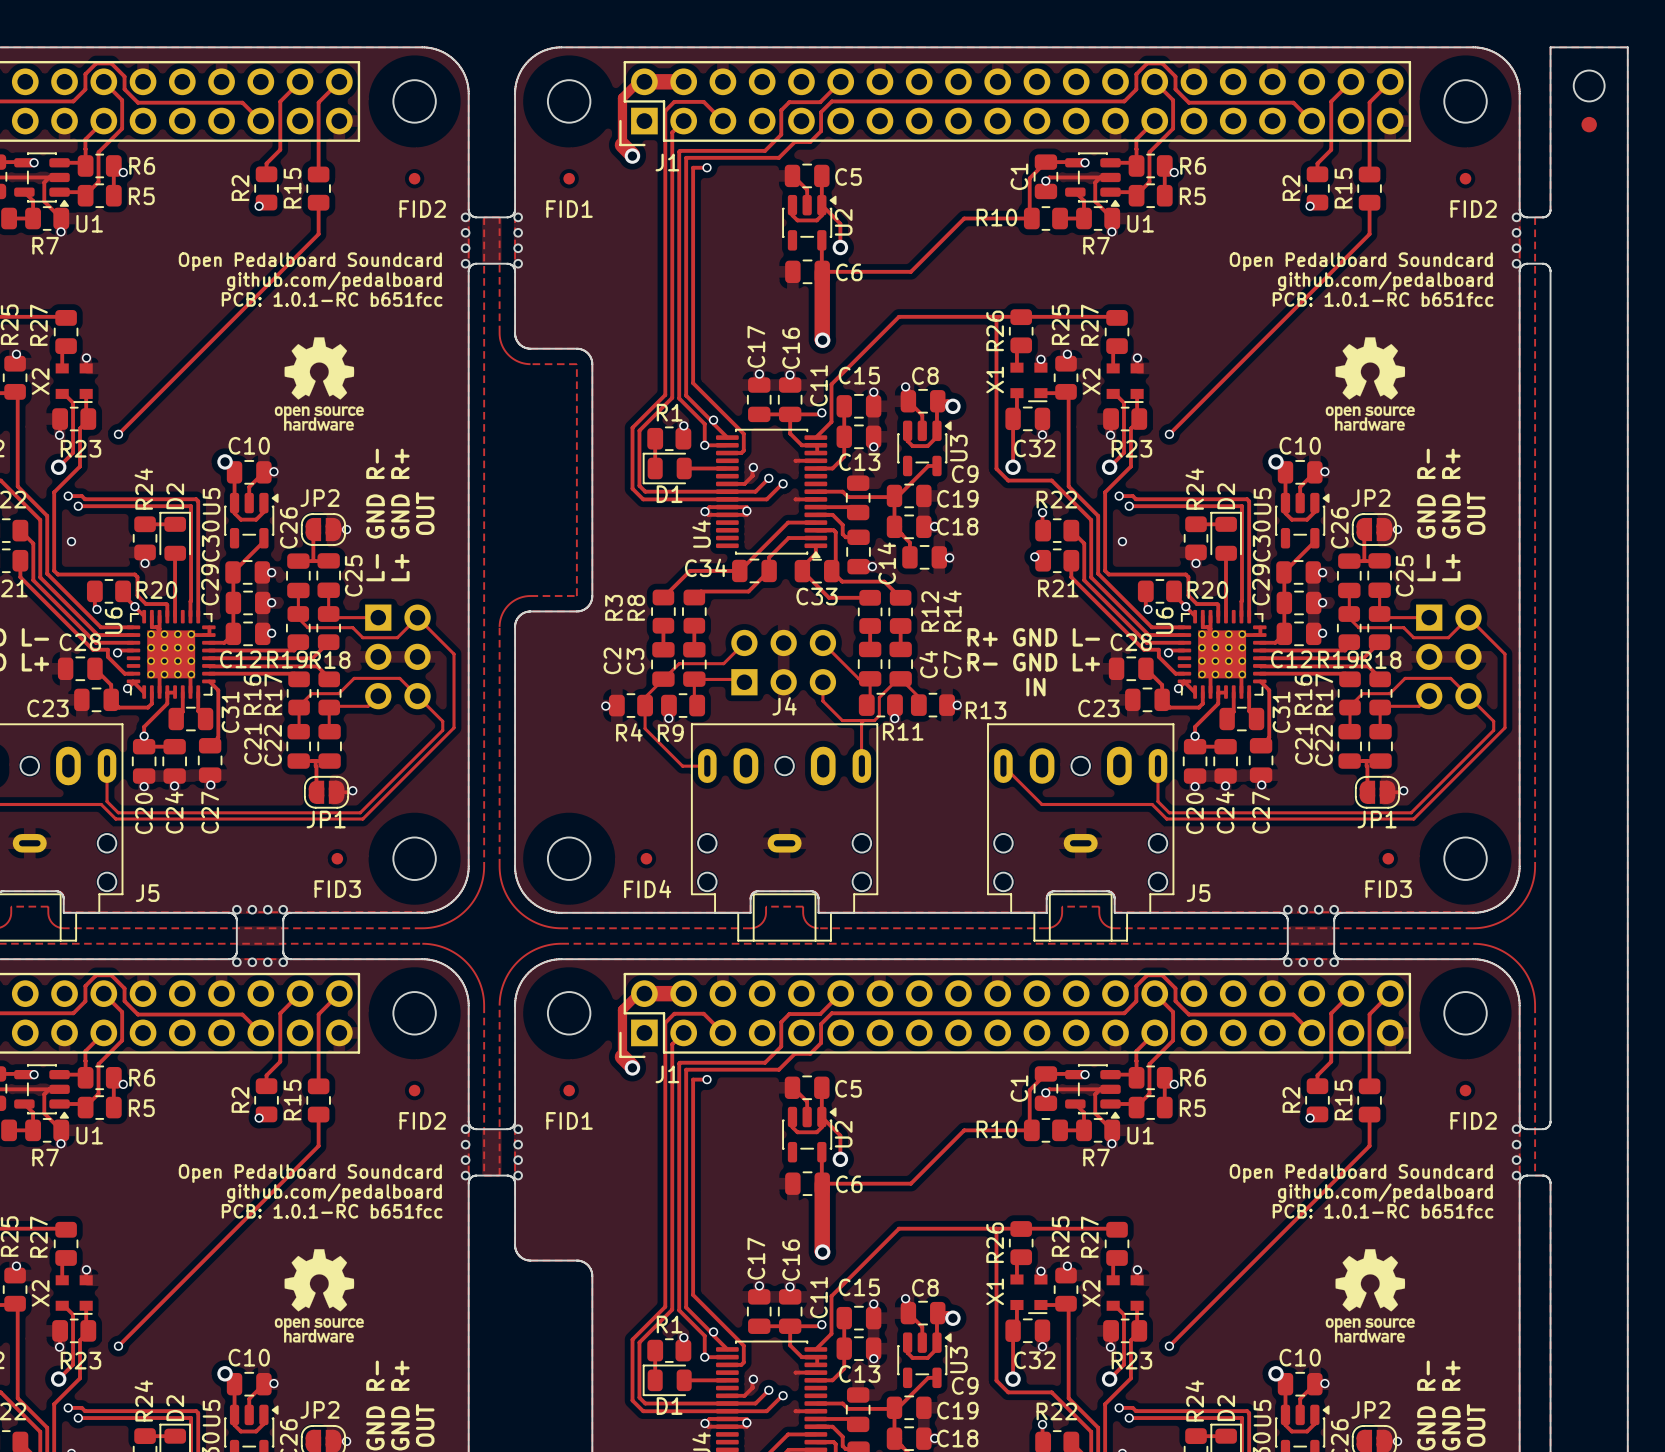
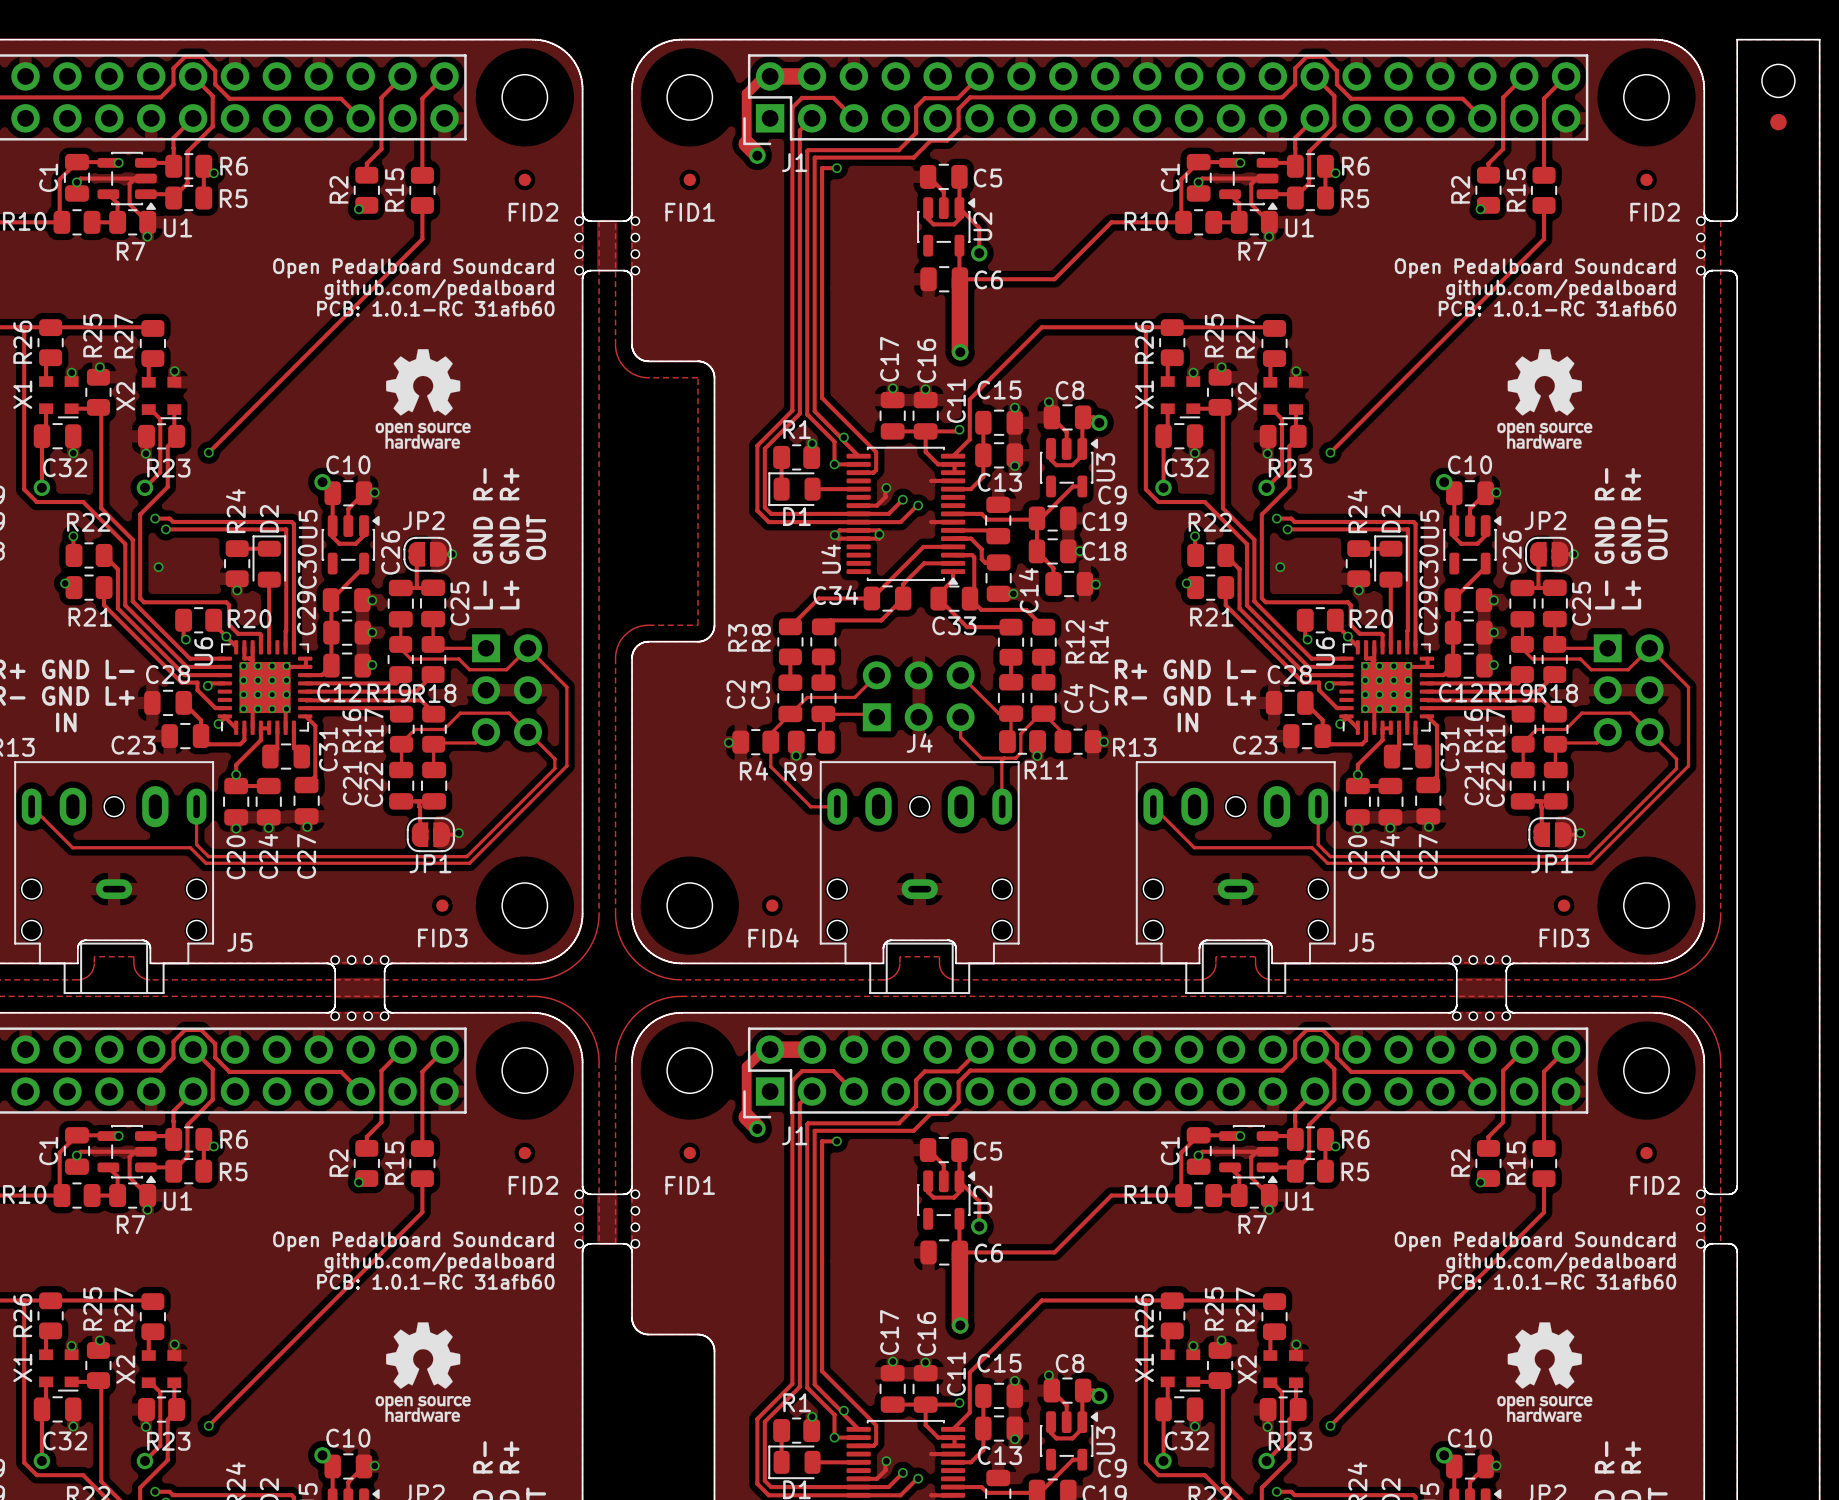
text: PCB: 1.0.1-RC b651fcc (332, 299) -> PCB: 1.0.1-RC 31afb60 (435, 308)
text: PCB: 1.0.1-RC b651fcc (1383, 299) -> PCB: 1.0.1-RC 31afb60 (1557, 308)
text: PCB: 1.0.1-RC b651fcc (332, 1211) -> PCB: 1.0.1-RC 31afb60 (435, 1281)
text: PCB: 1.0.1-RC b651fcc (1383, 1211) -> PCB: 1.0.1-RC 31afb60 (1557, 1281)

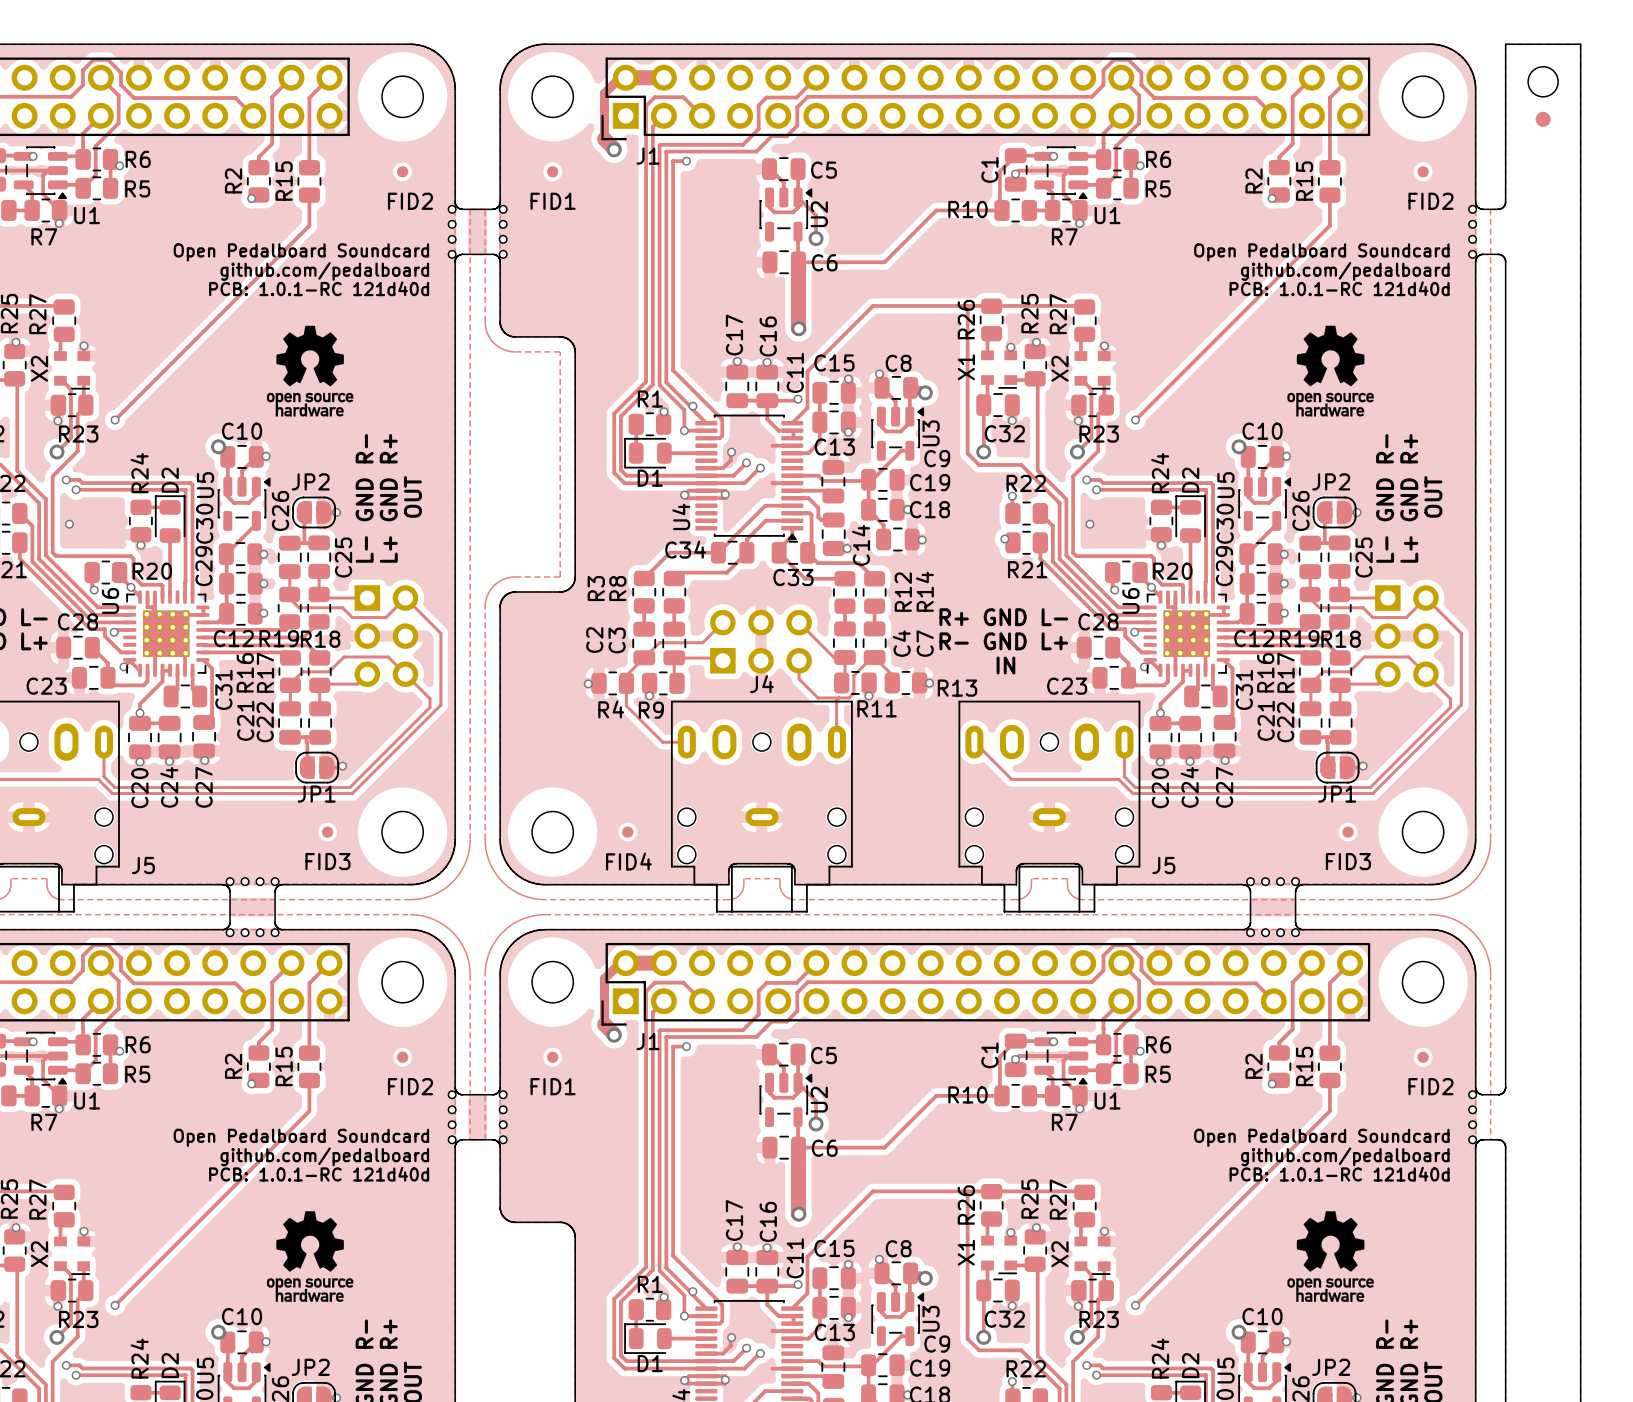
text: PCB: 1.0.1-RC 31afb60 (435, 308) -> PCB: 1.0.1-RC 121d40d (319, 288)
text: PCB: 1.0.1-RC 31afb60 (1557, 308) -> PCB: 1.0.1-RC 121d40d (1339, 288)
text: PCB: 1.0.1-RC 31afb60 (435, 1281) -> PCB: 1.0.1-RC 121d40d (319, 1174)
text: PCB: 1.0.1-RC 31afb60 (1557, 1281) -> PCB: 1.0.1-RC 121d40d (1339, 1174)

